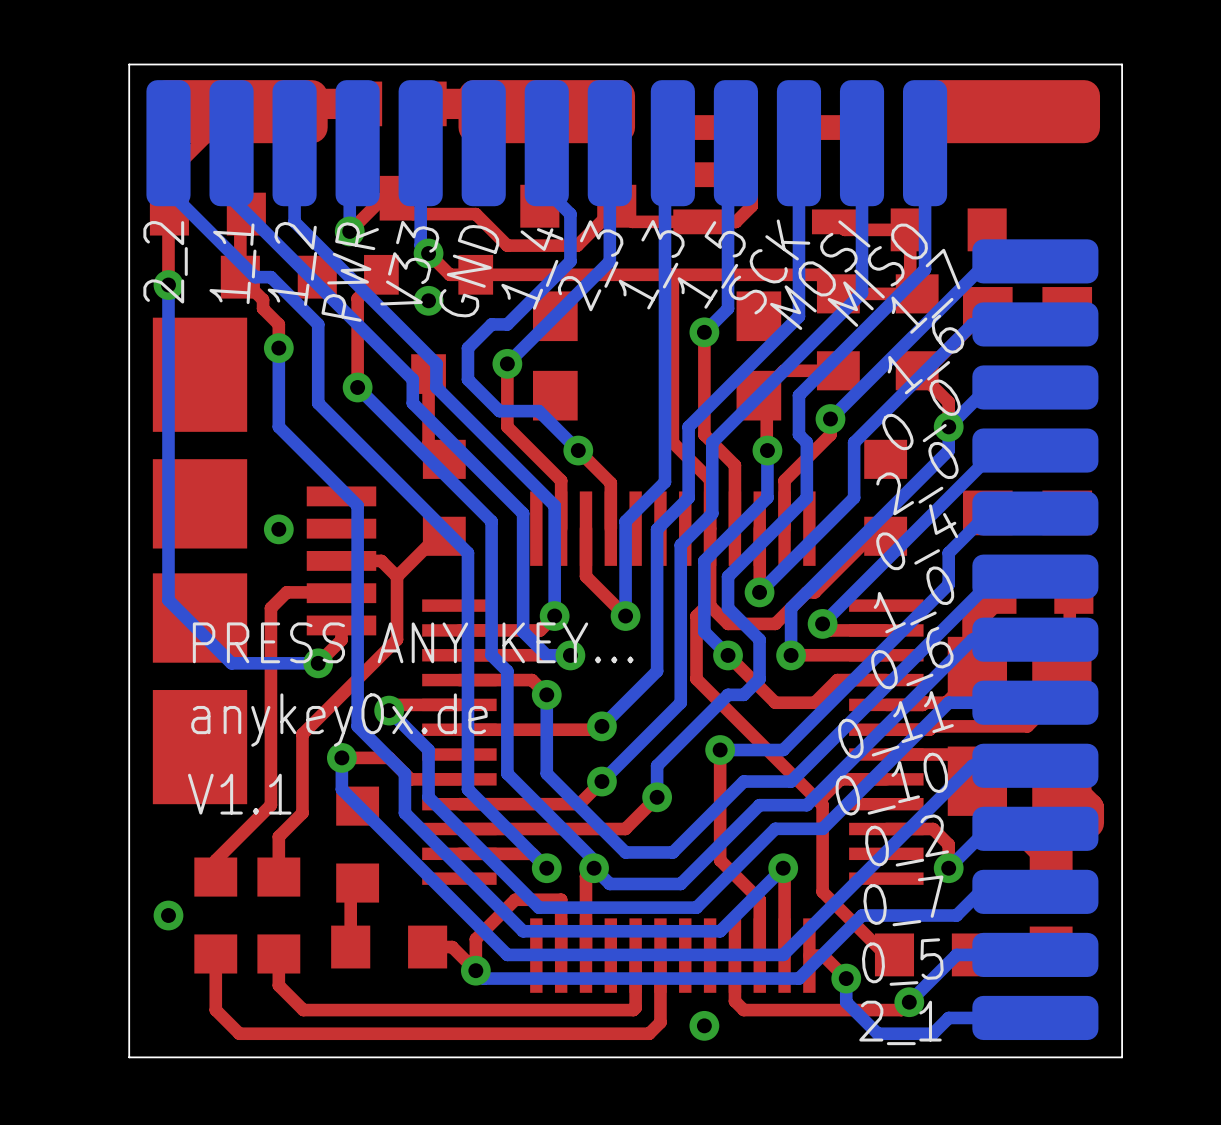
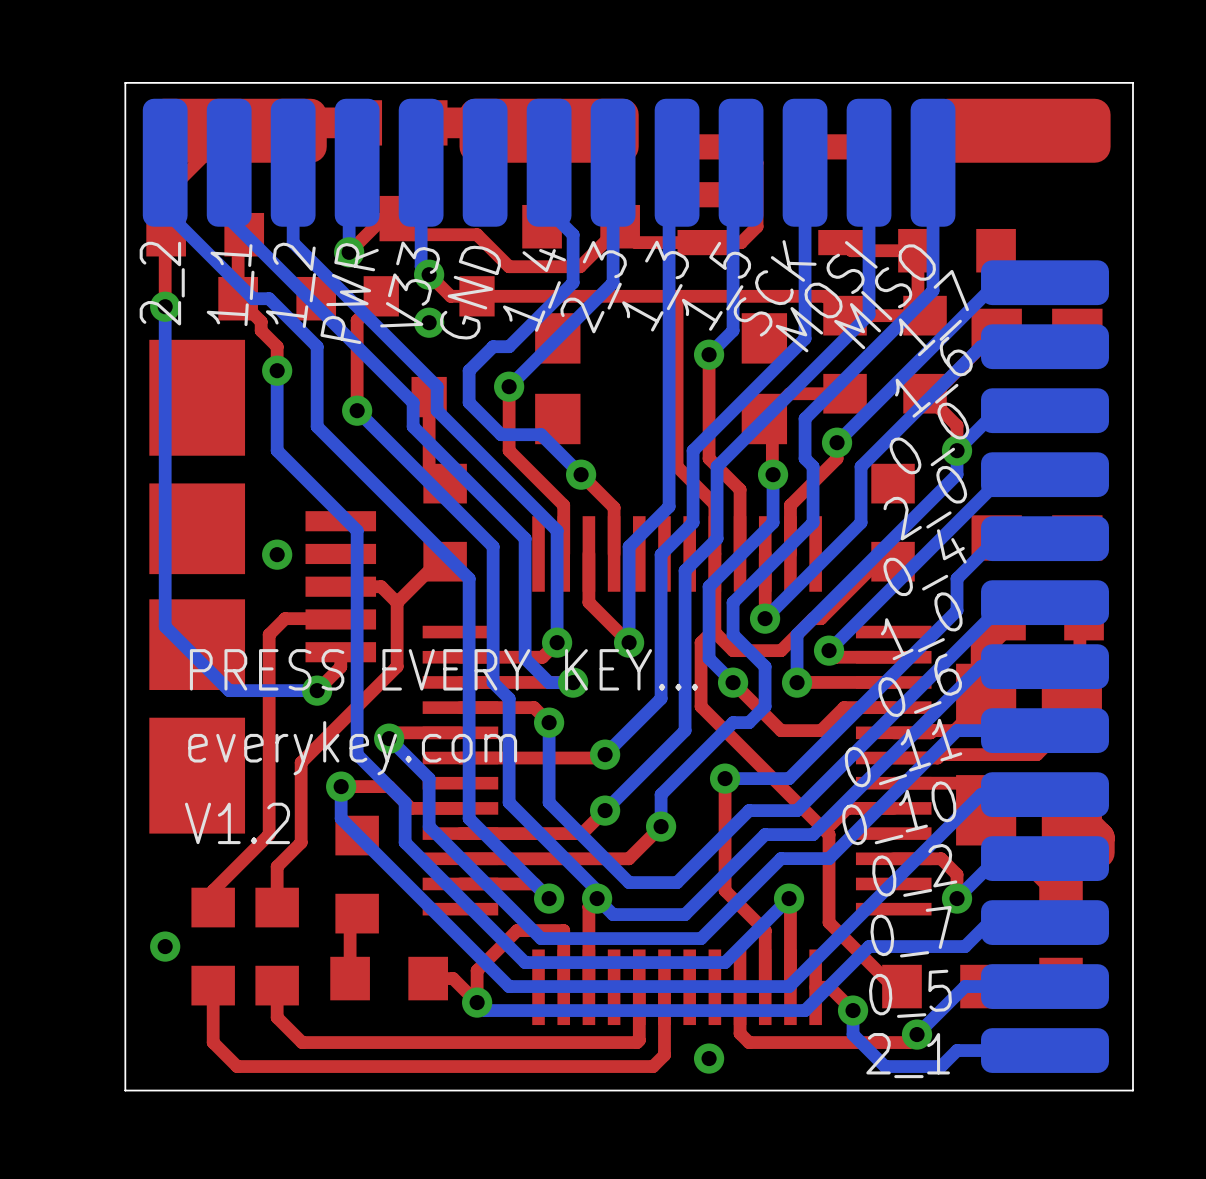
text: PRESS ANY KEY... (413, 642) -> PRESS EVERY KEY... (444, 669)
text: anykey0x.de (339, 720) -> everykey.com (352, 748)
text: V1.1 (239, 794) -> V1.2 (237, 823)

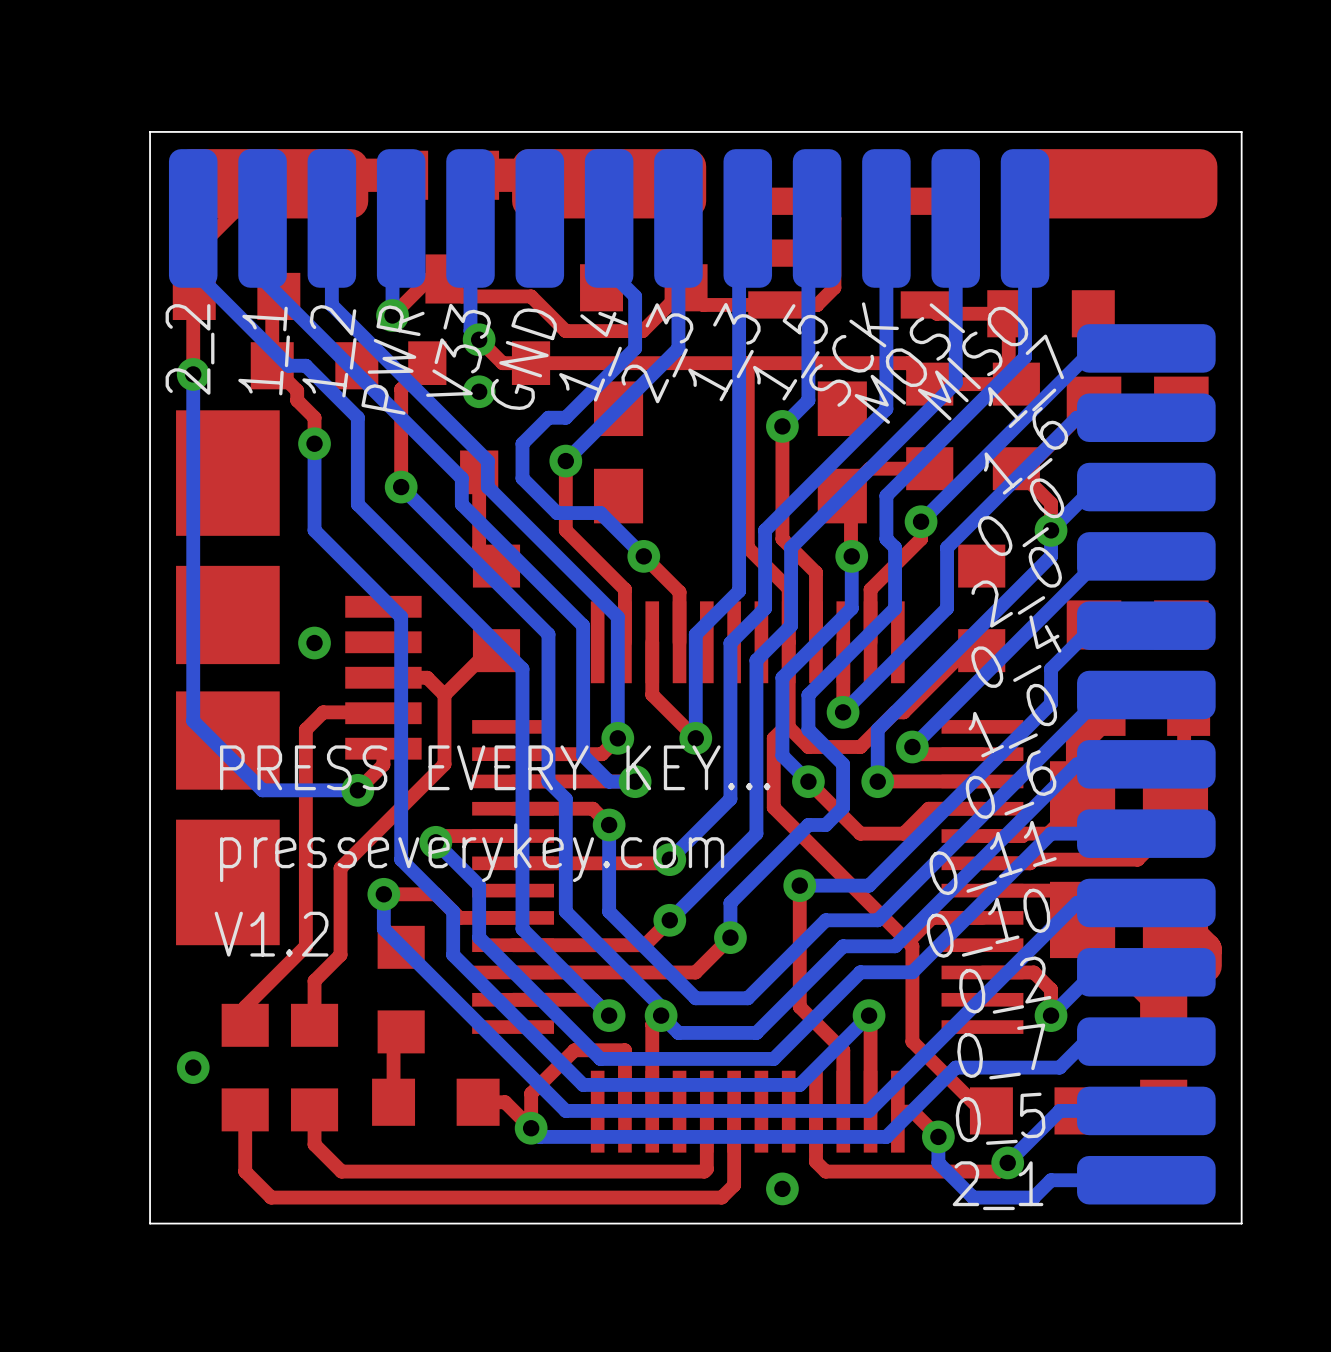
text: everykey.com (352, 748) -> presseverykey.com (472, 852)

